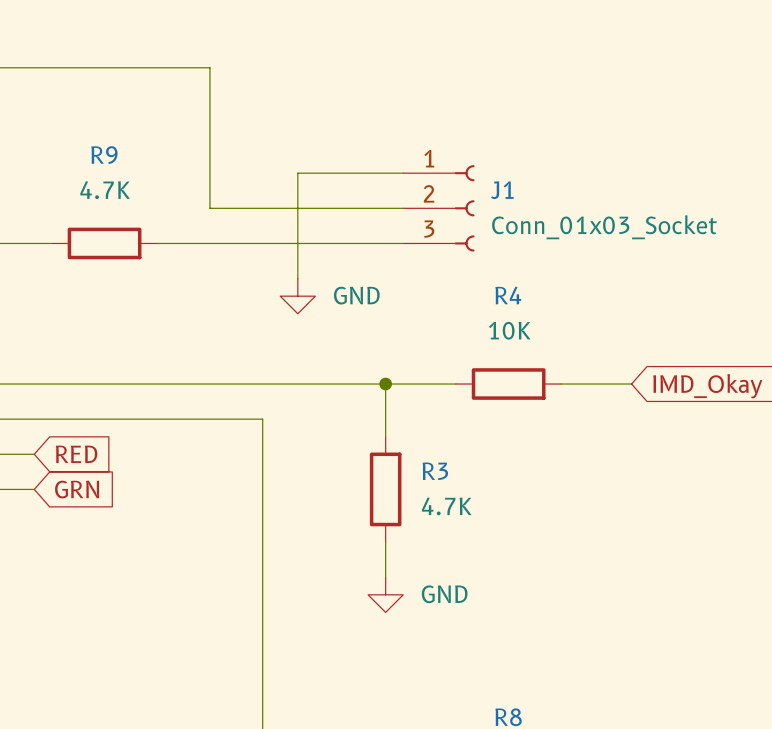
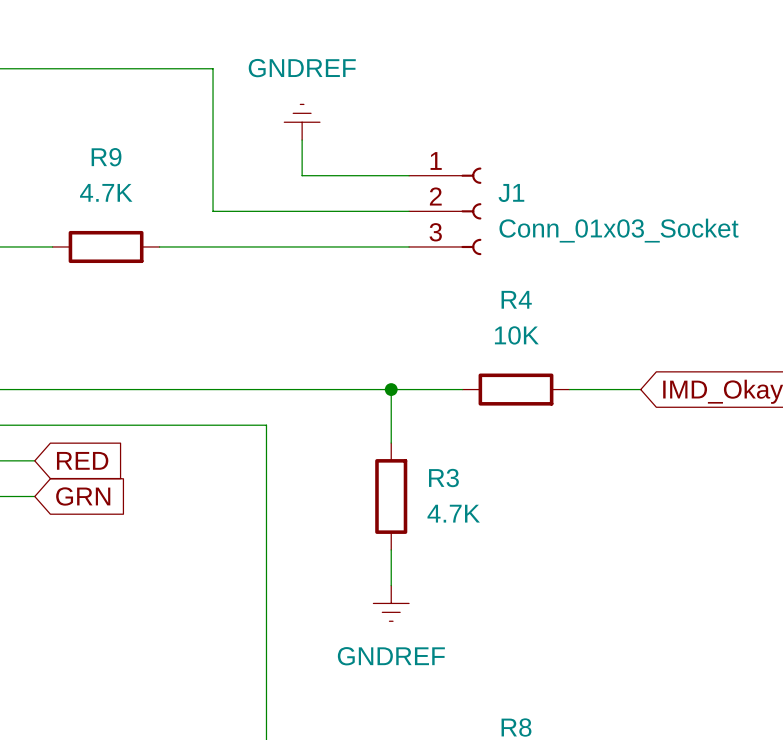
power symbol: none -> GNDREF (302, 122)
wire: (297, 173) (297, 278) -> (302, 175) (302, 140)
power symbol: GND (297, 296) -> none
power symbol: GND (385, 594) -> GNDREF (391, 603)

